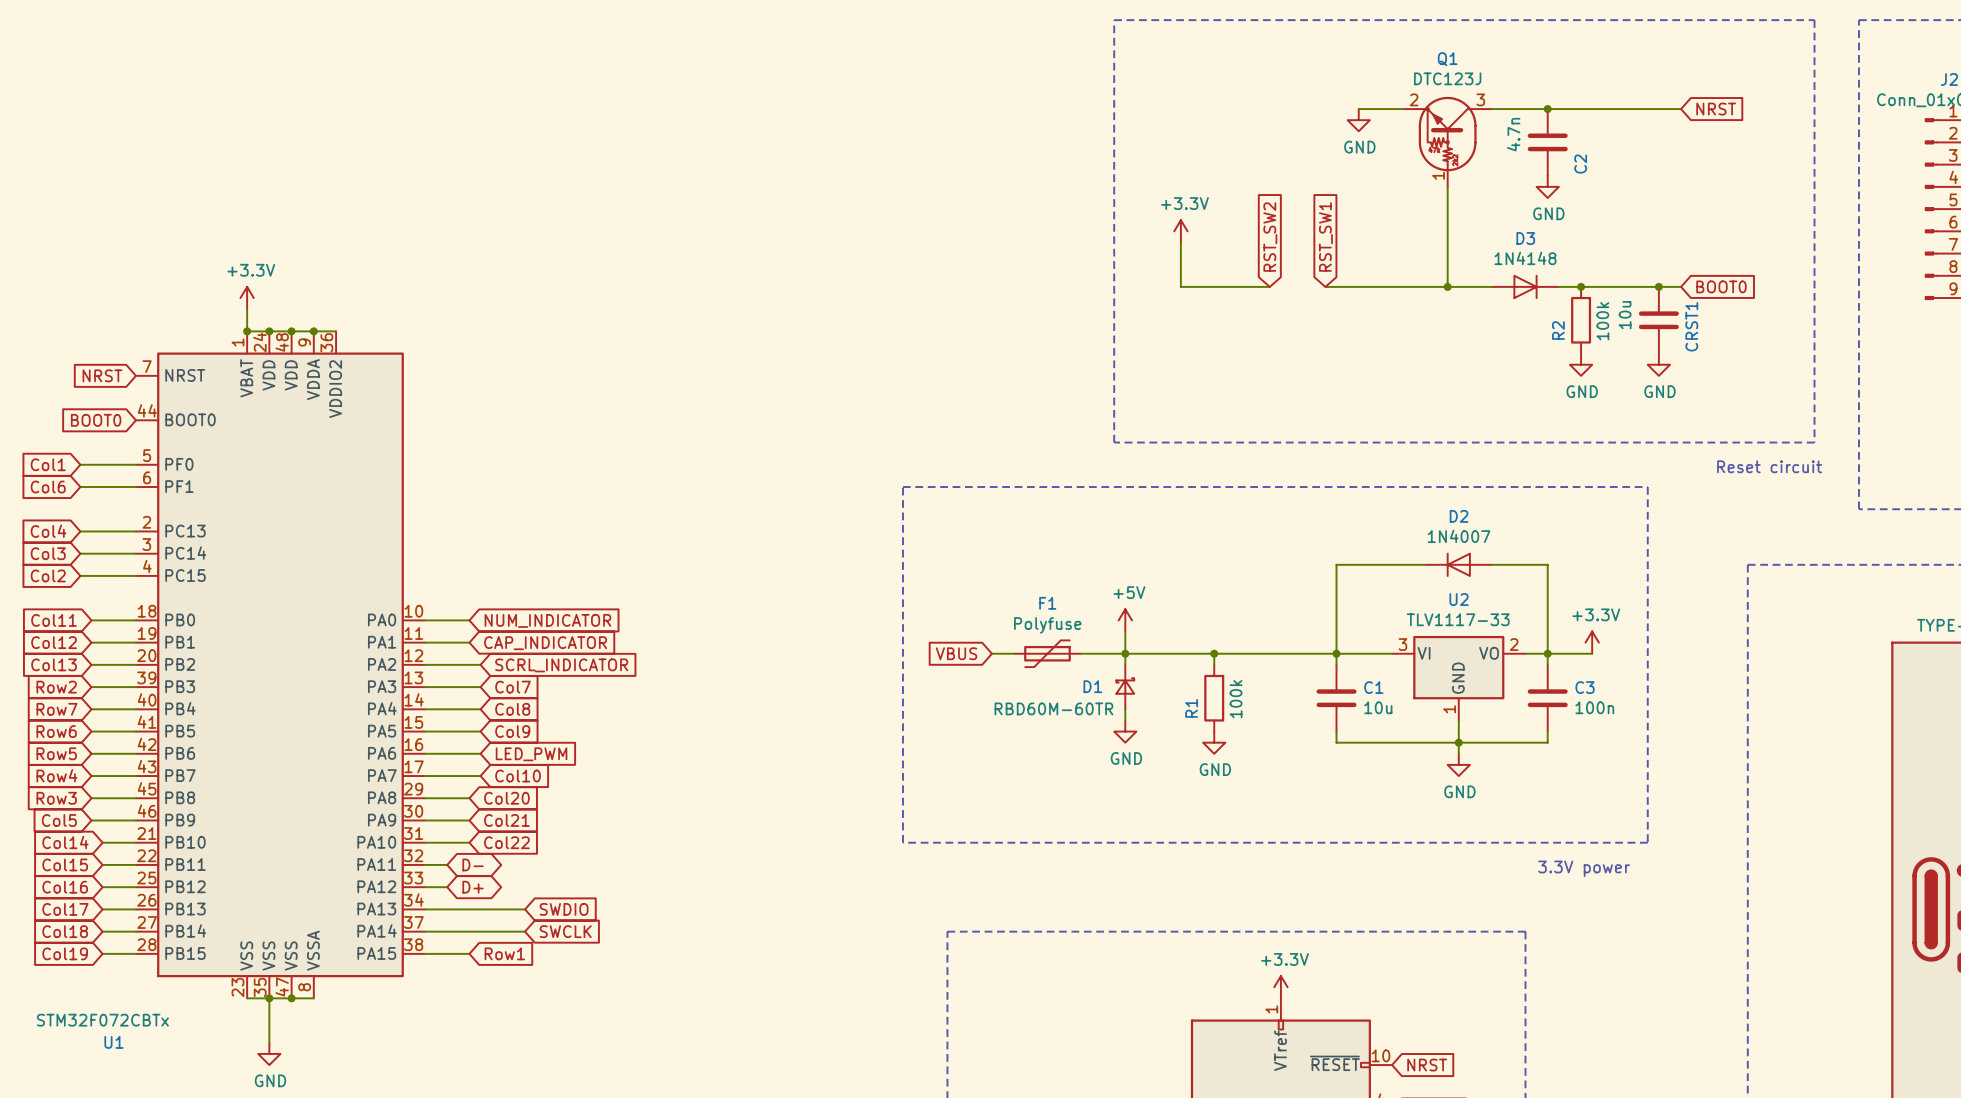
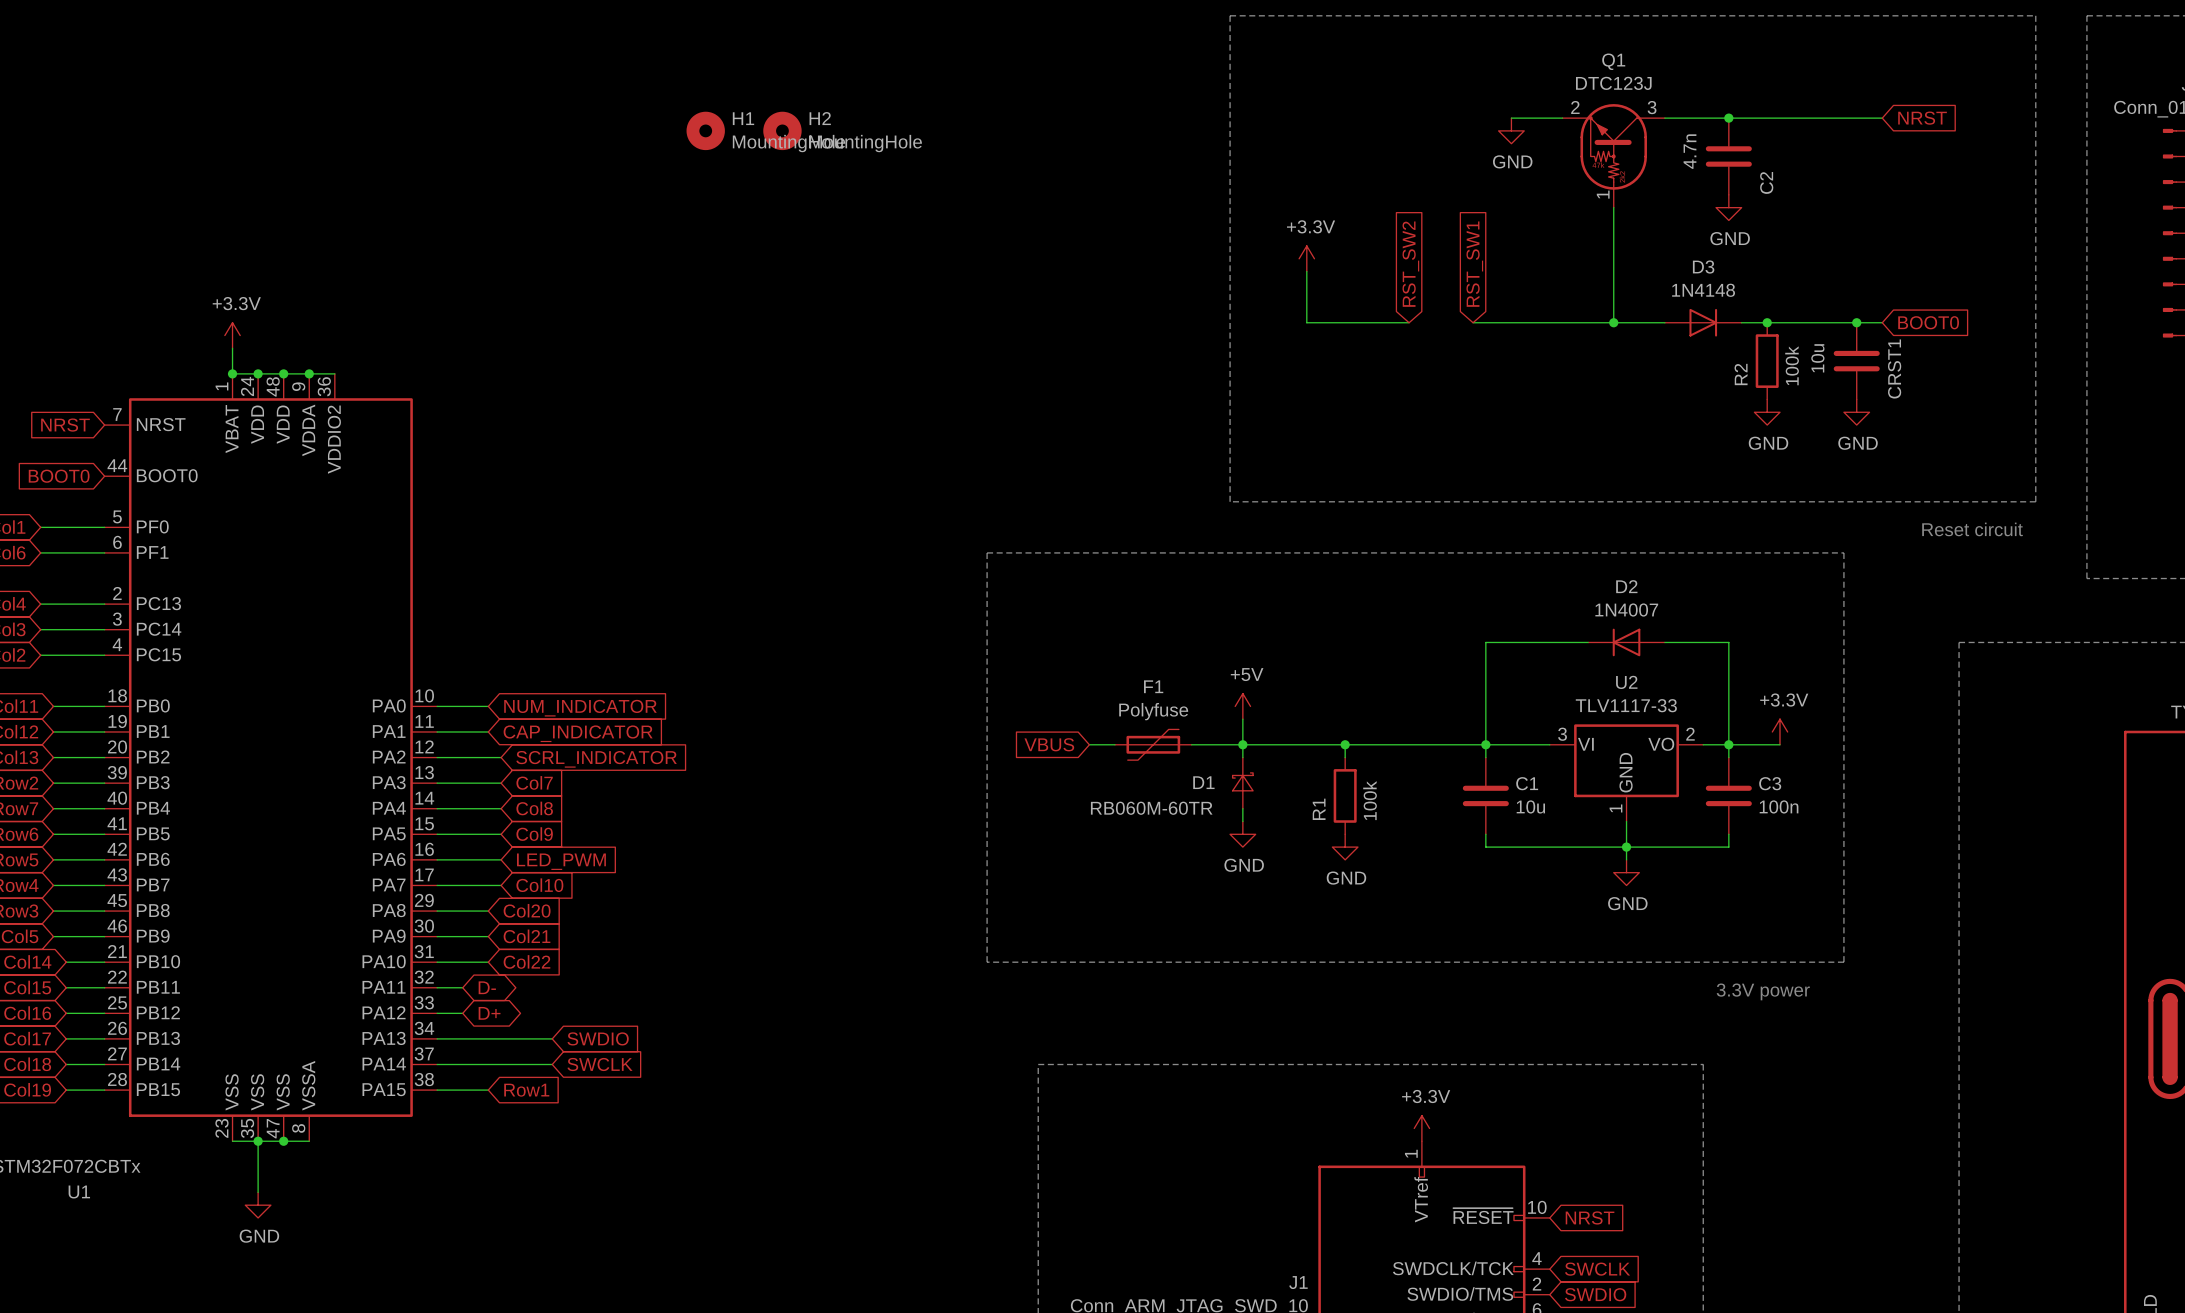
H1: none -> MountingHole (705, 130)
H2: none -> MountingHole (782, 130)
D1 value: RBD60M-60TR (1053, 708) -> RB060M-60TR (1151, 808)

